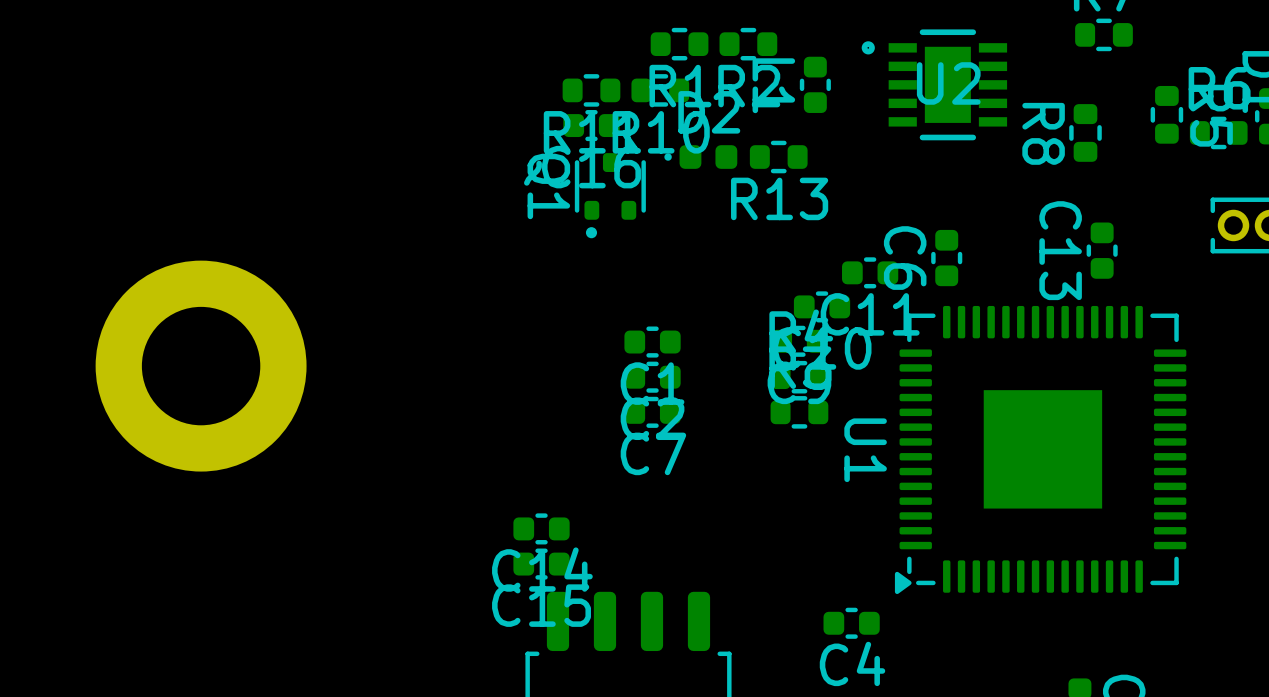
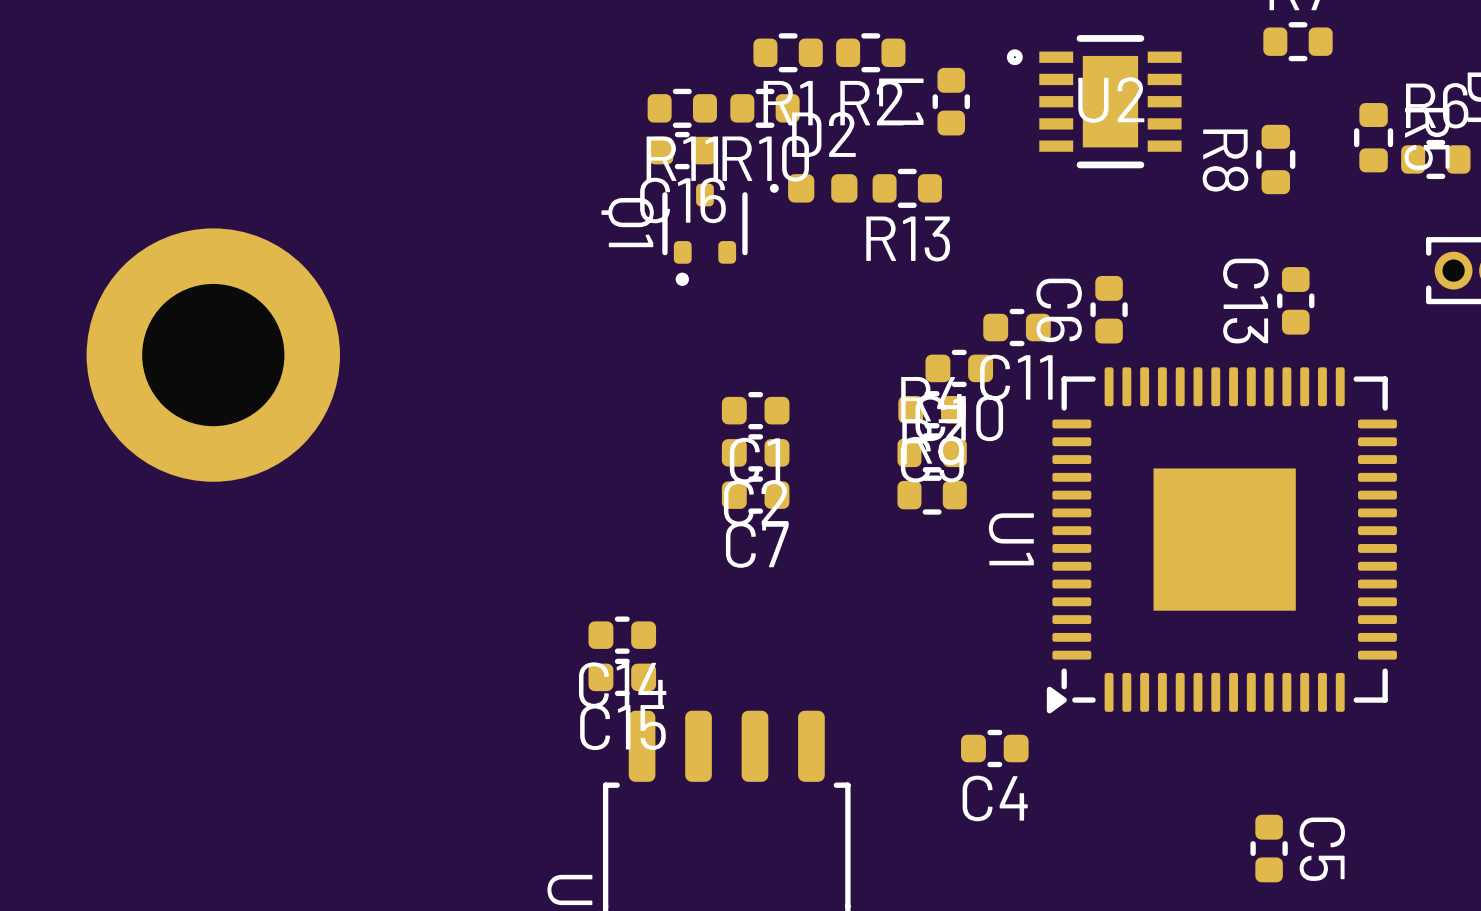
part position: (201, 366) -> (213, 355)

